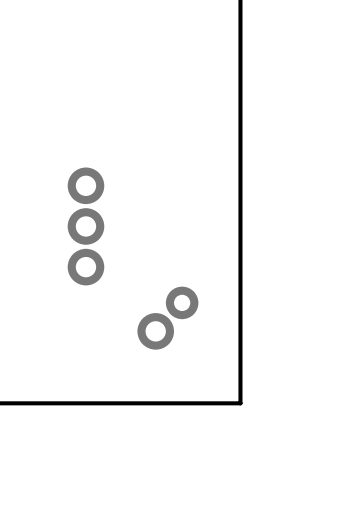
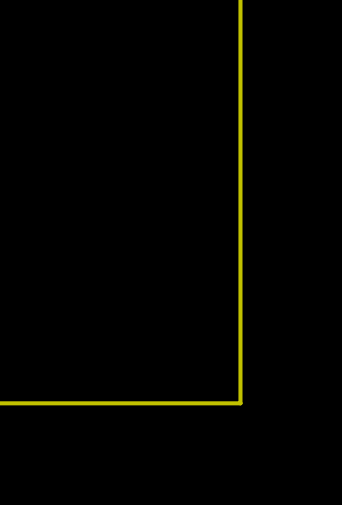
via: (85, 185) -> none
via: (85, 226) -> none
via: (85, 267) -> none
via: (182, 302) -> none
via: (155, 331) -> none

